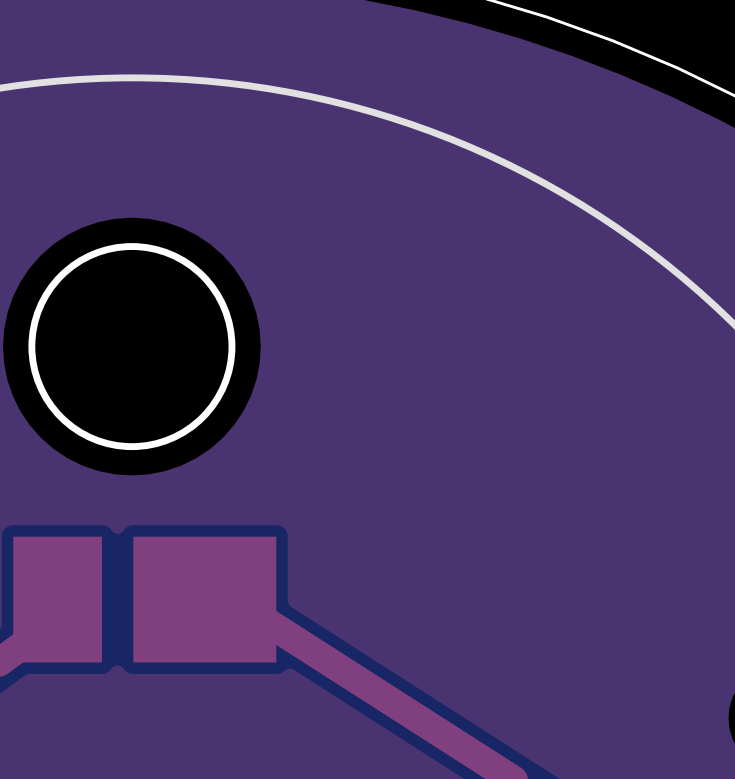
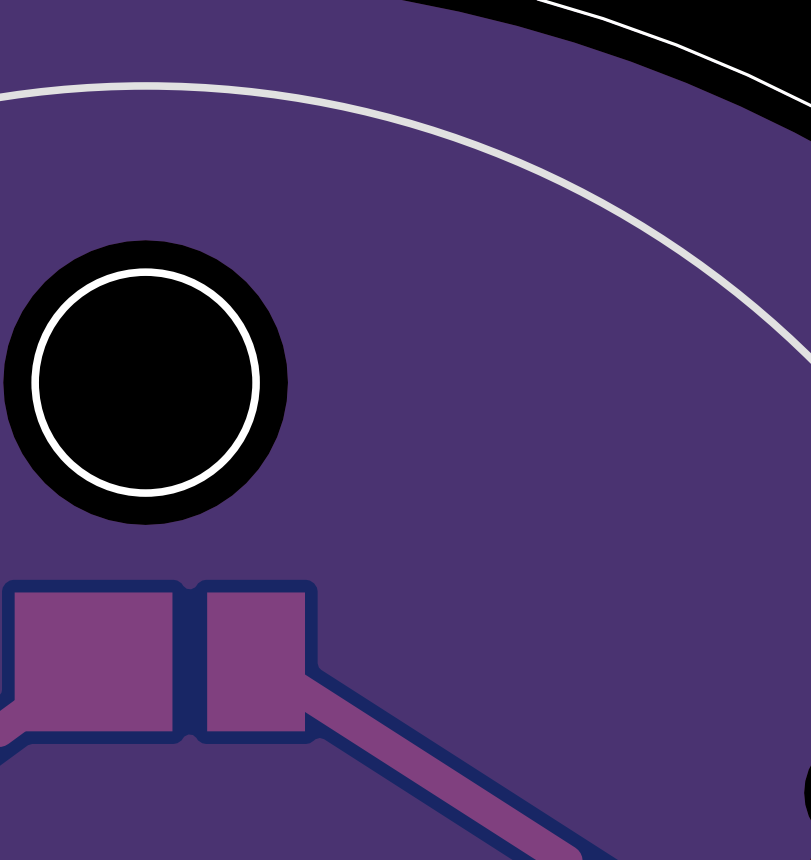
part rotation: 0° (144, 599) -> 180° (159, 661)

